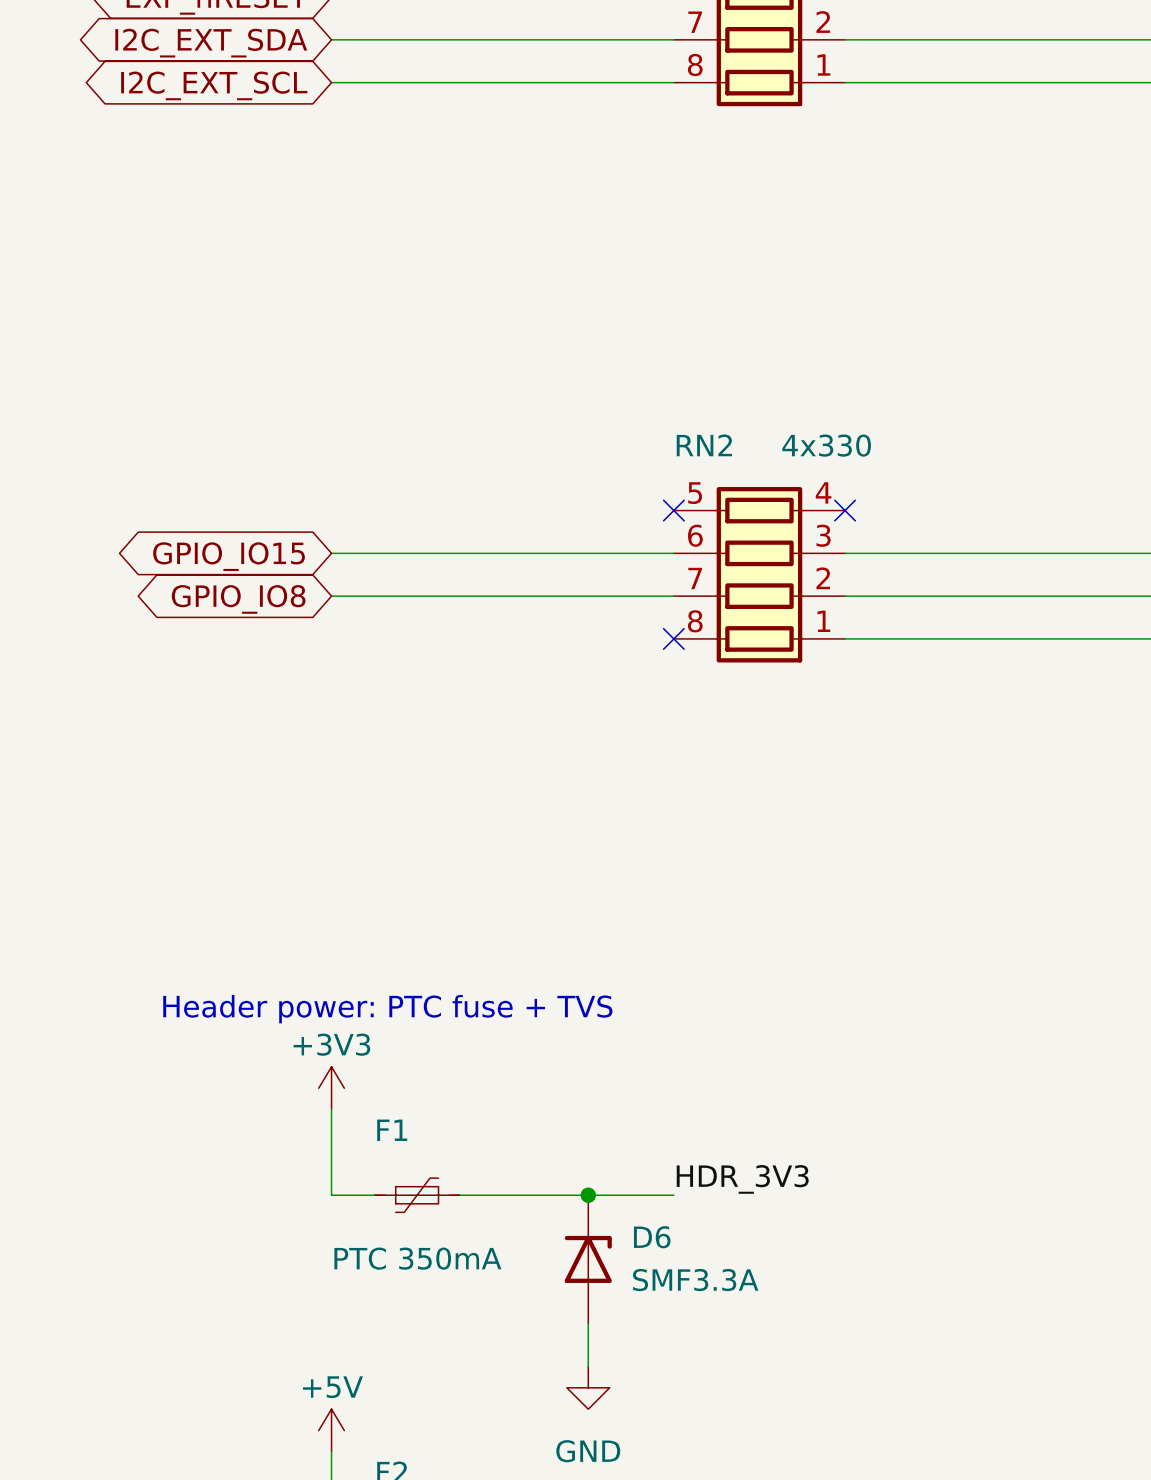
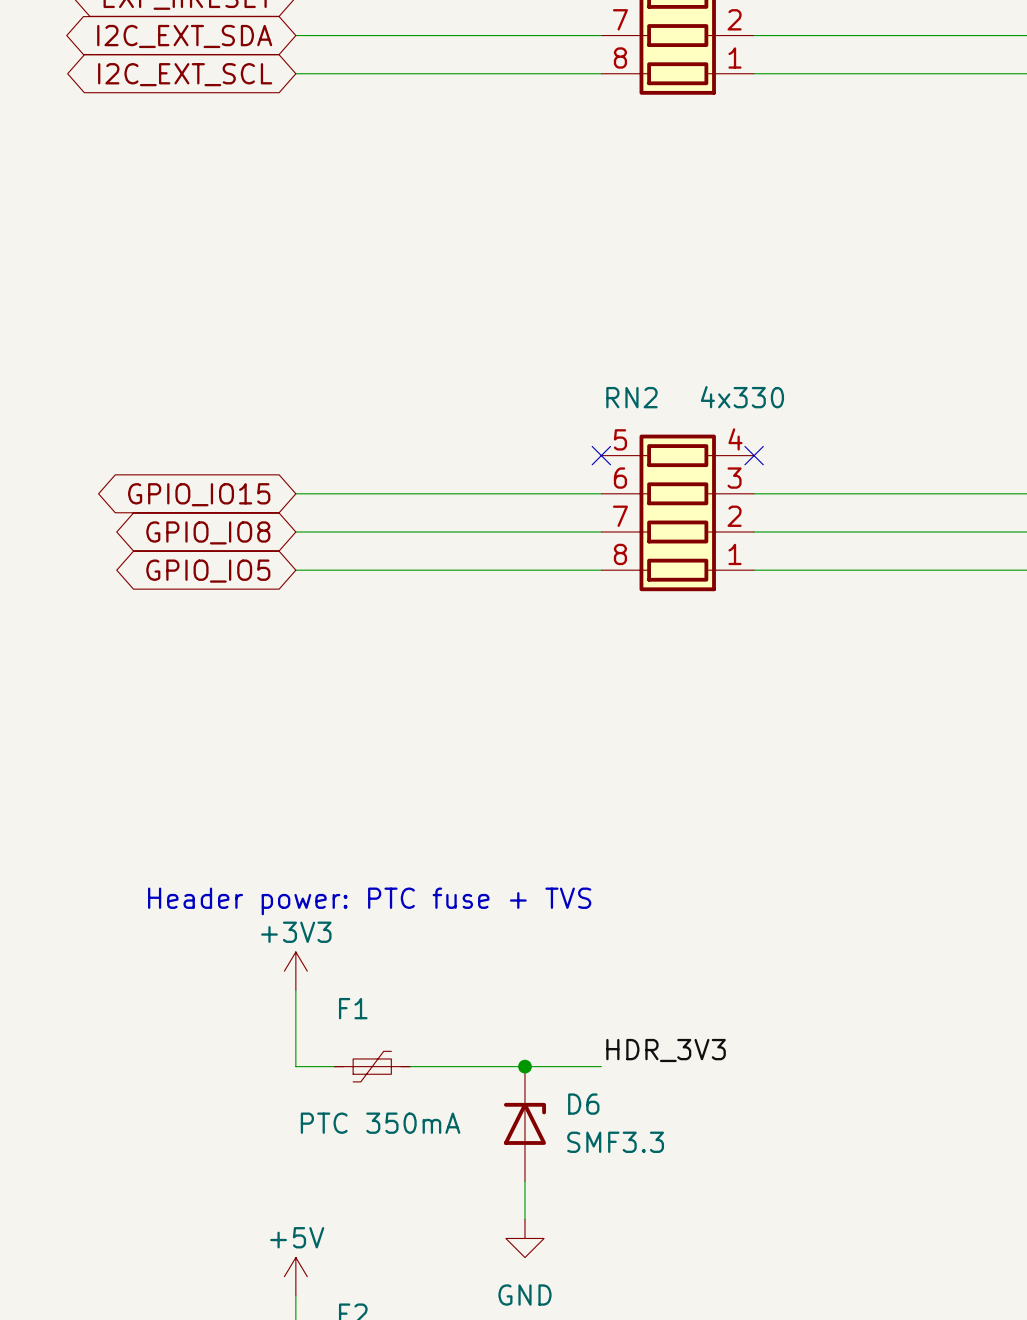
wire: none -> (295, 570) (601, 570)
no-connect mark: (673, 638) -> none
global label: none -> GPIO_IO5 (208, 571)
D6 value: SMF3.3A (695, 1280) -> SMF3.3 (615, 1142)

